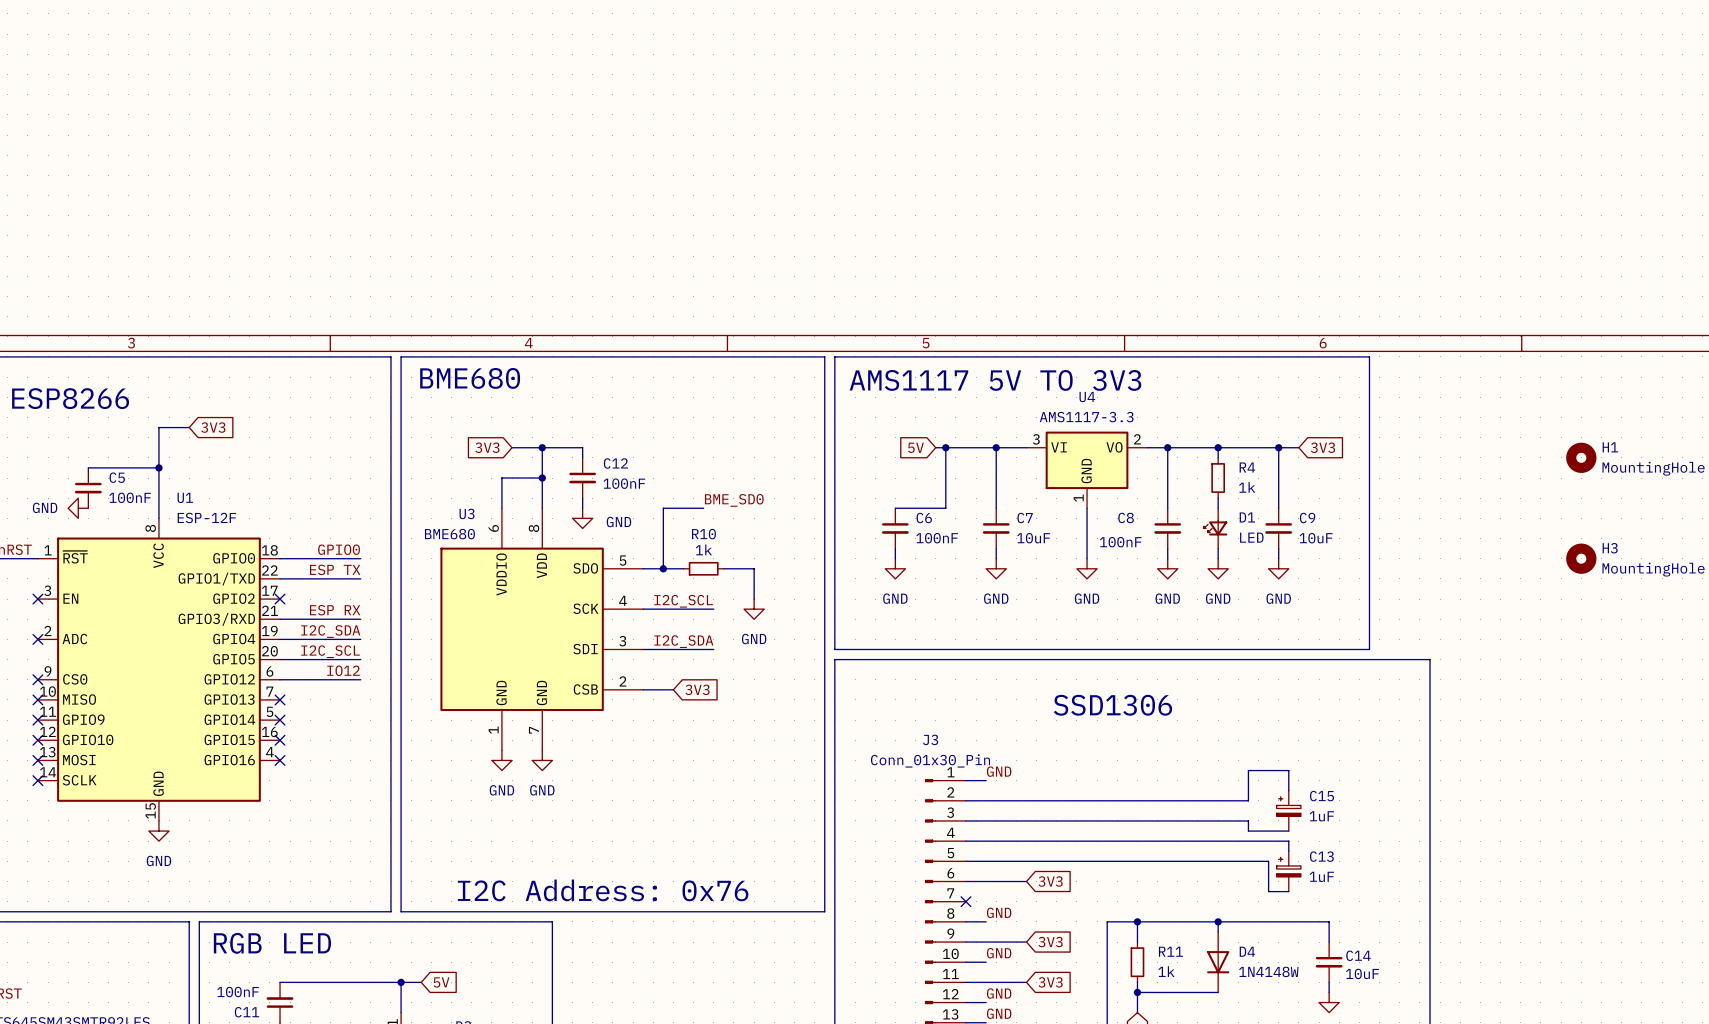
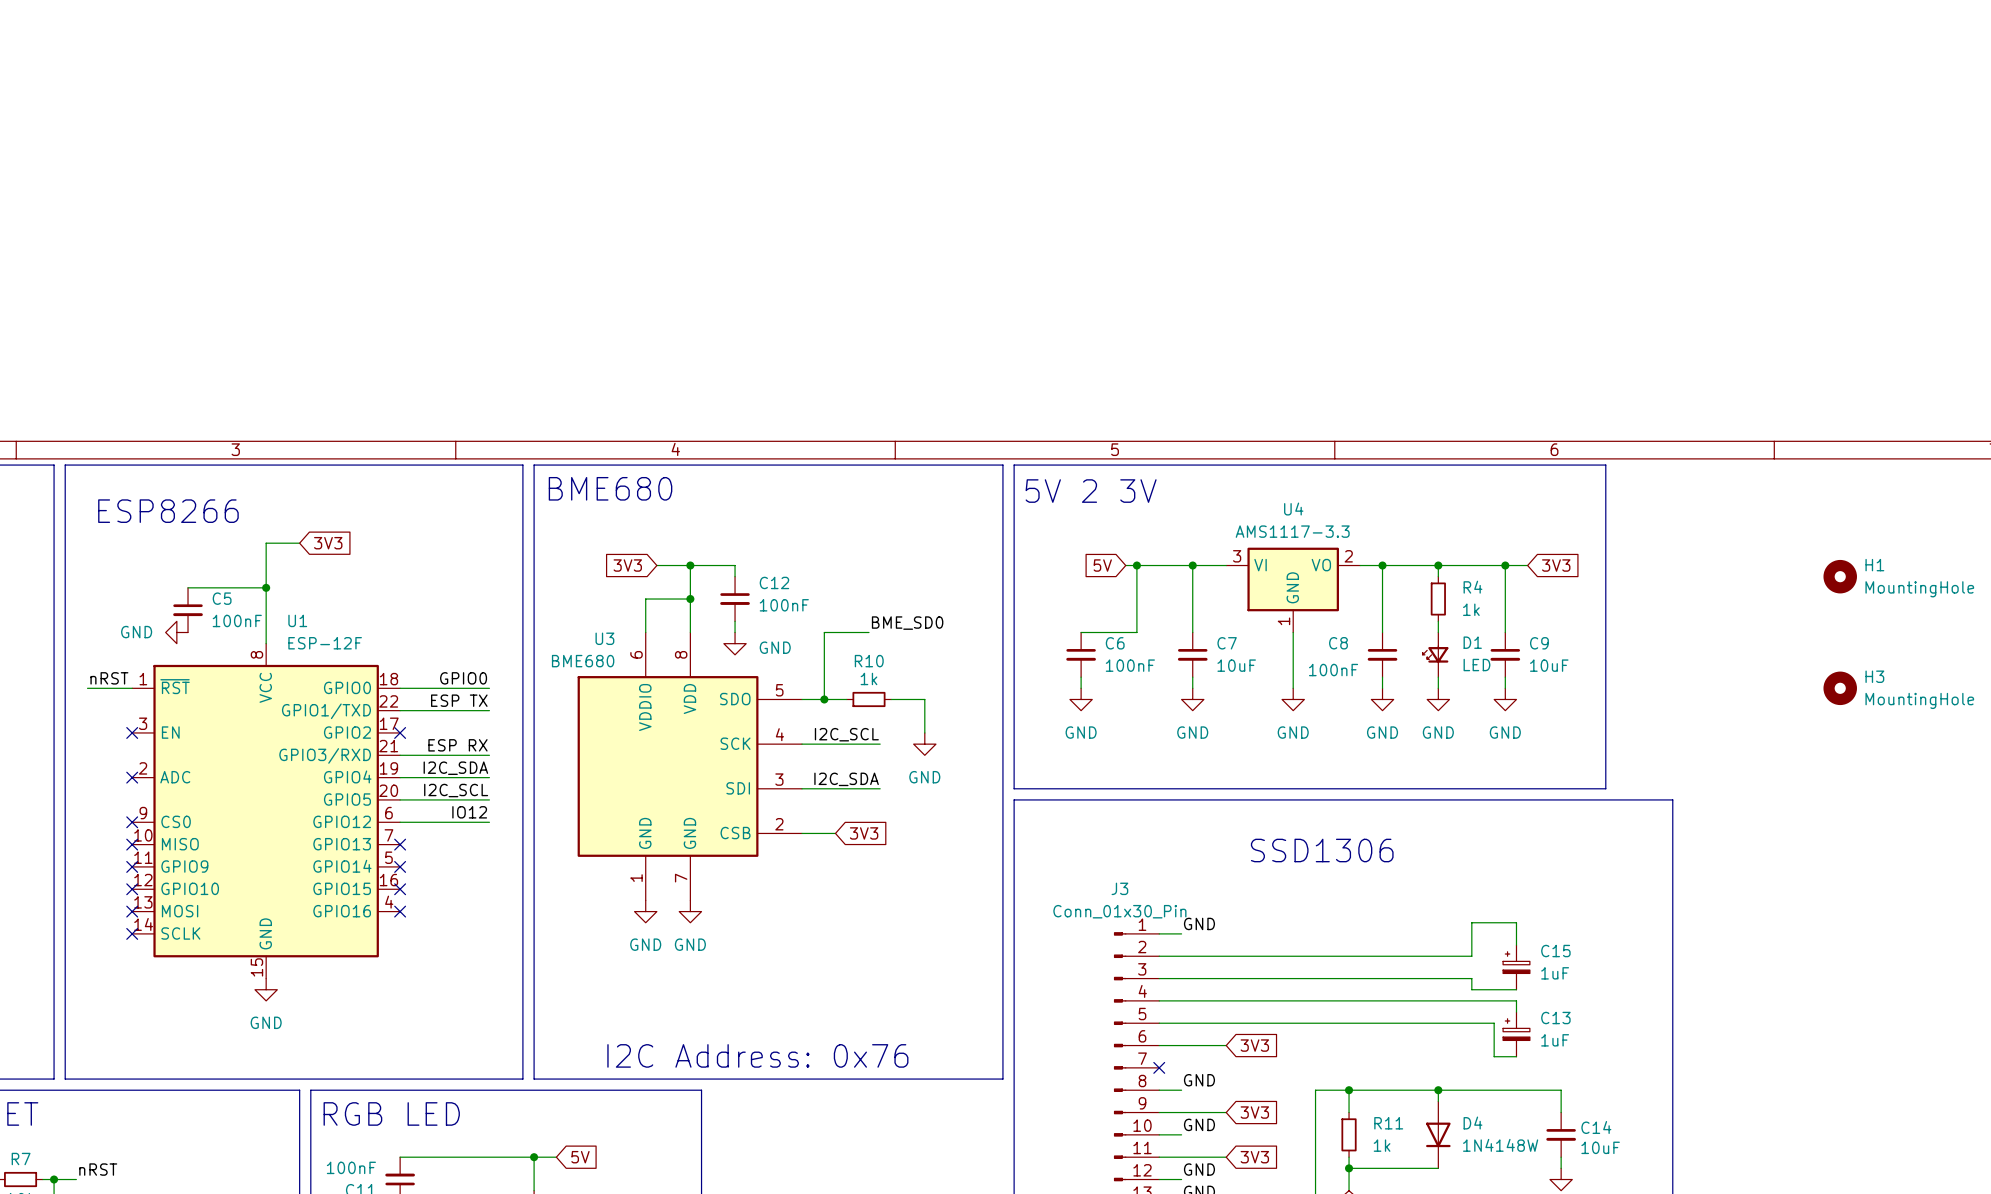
text: none -> 5V 2 3V (1091, 491)
text: AMS1117 5V TO 3V3 (995, 380) -> none

